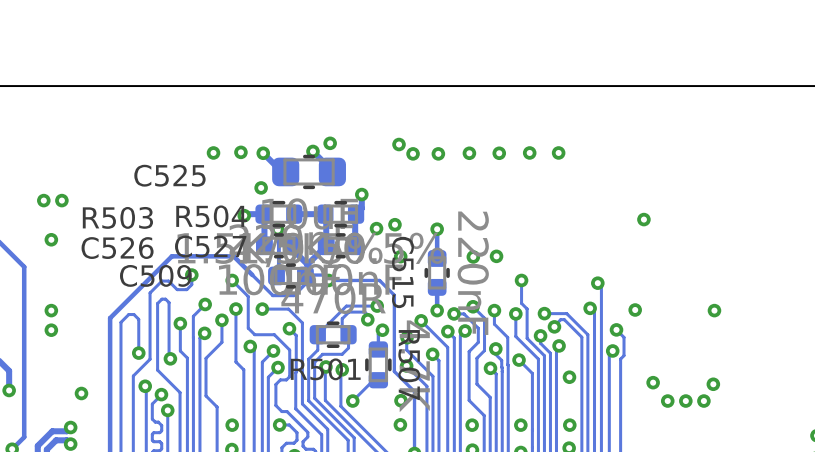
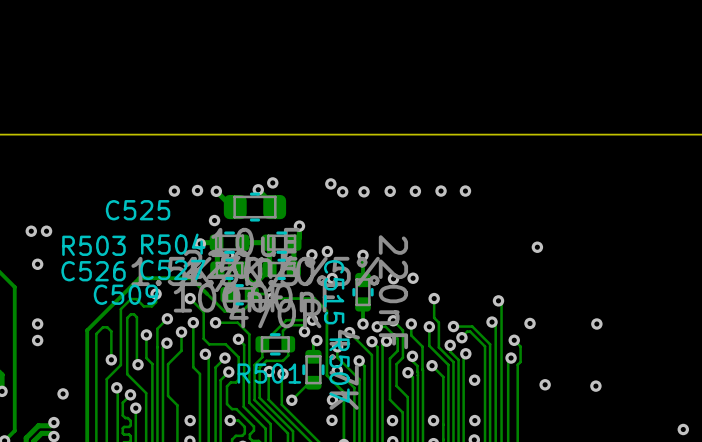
via: (667, 401) -> none
via: (685, 401) -> none
via: (703, 401) -> none

